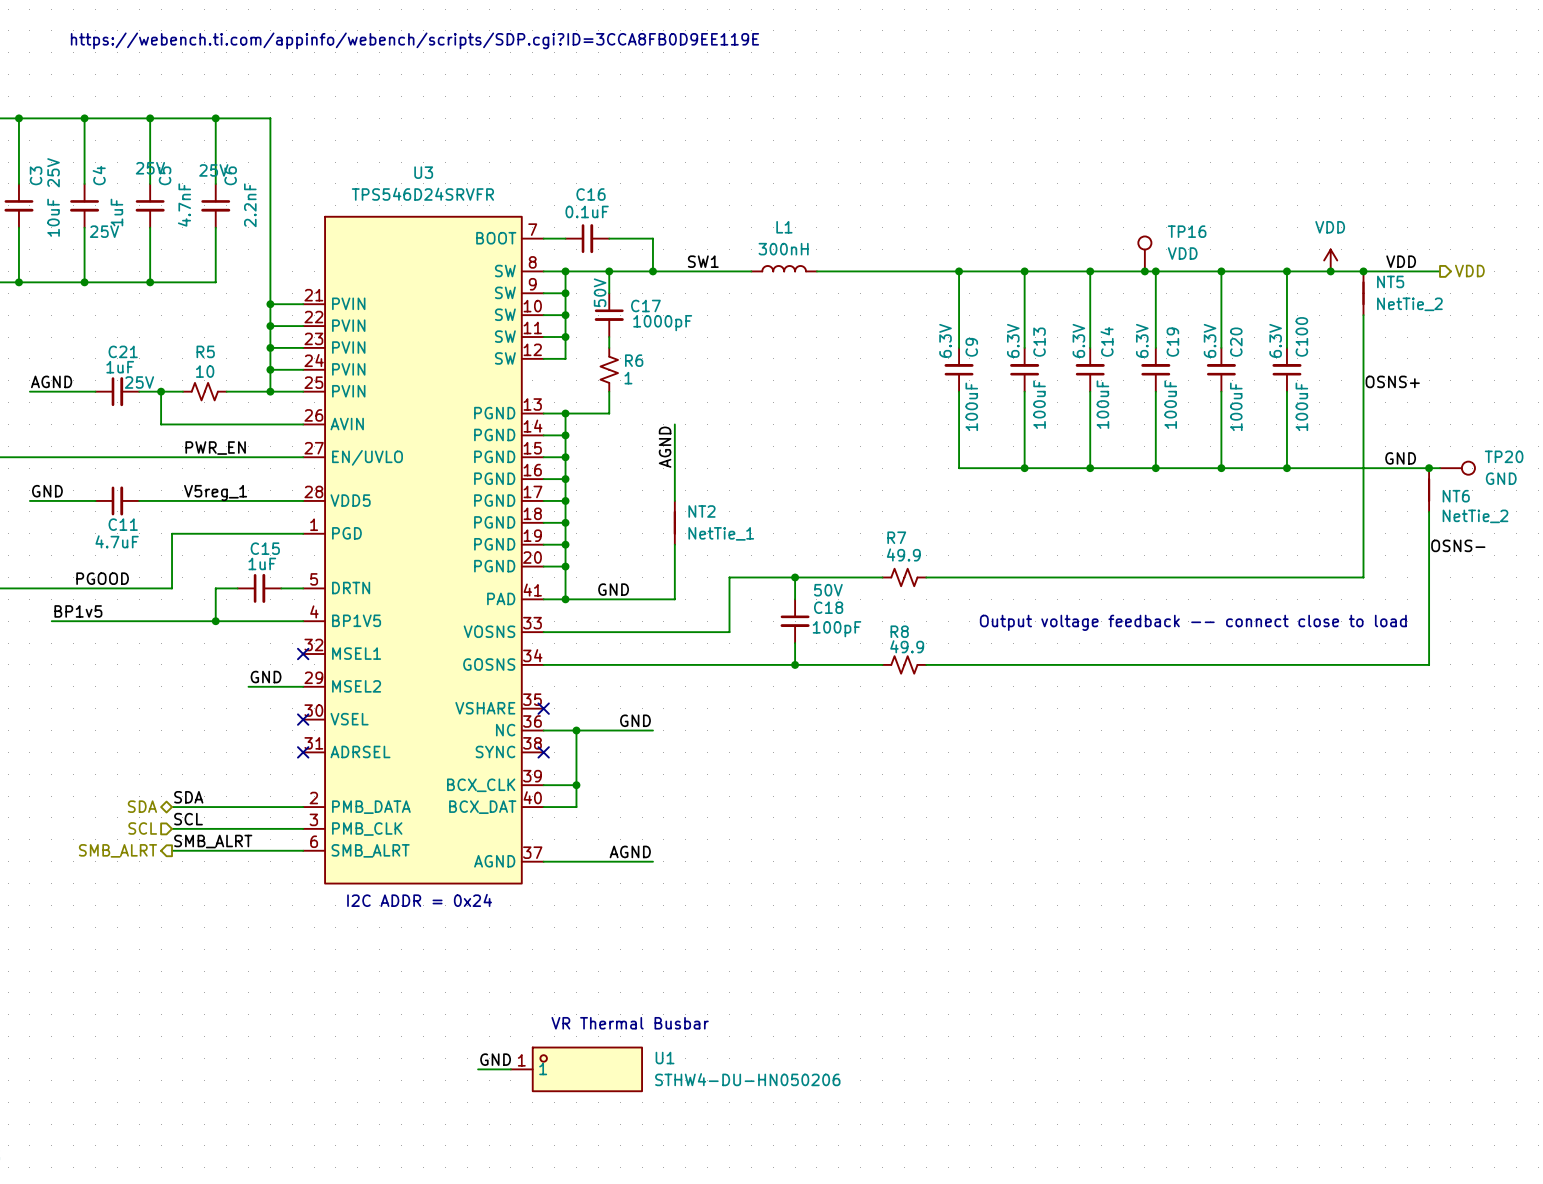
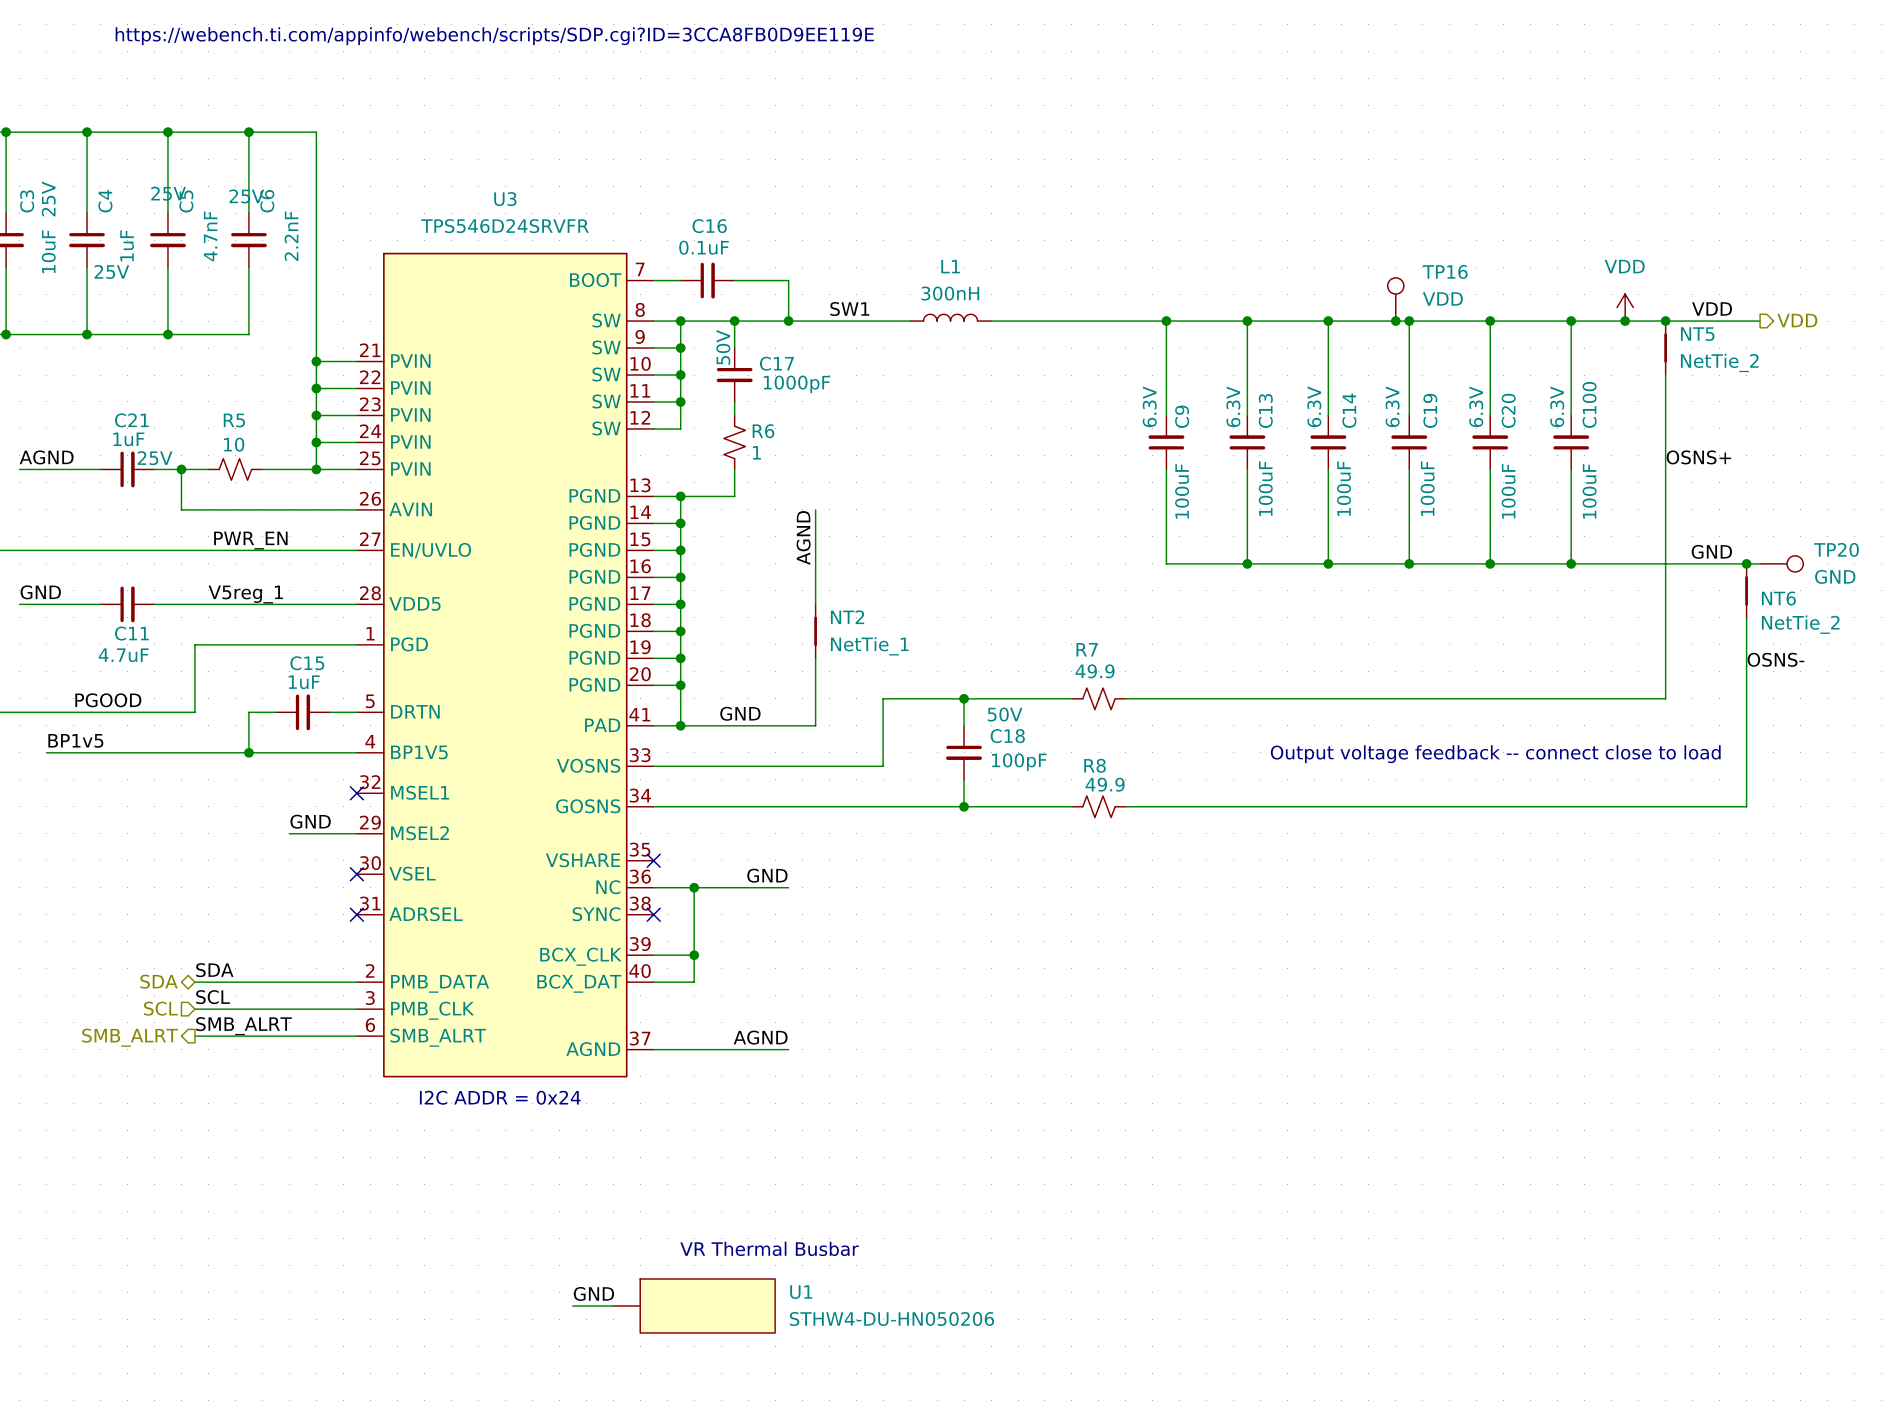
U1 symbol: [510, 1047, 643, 1092] -> [613, 1279, 776, 1333]

